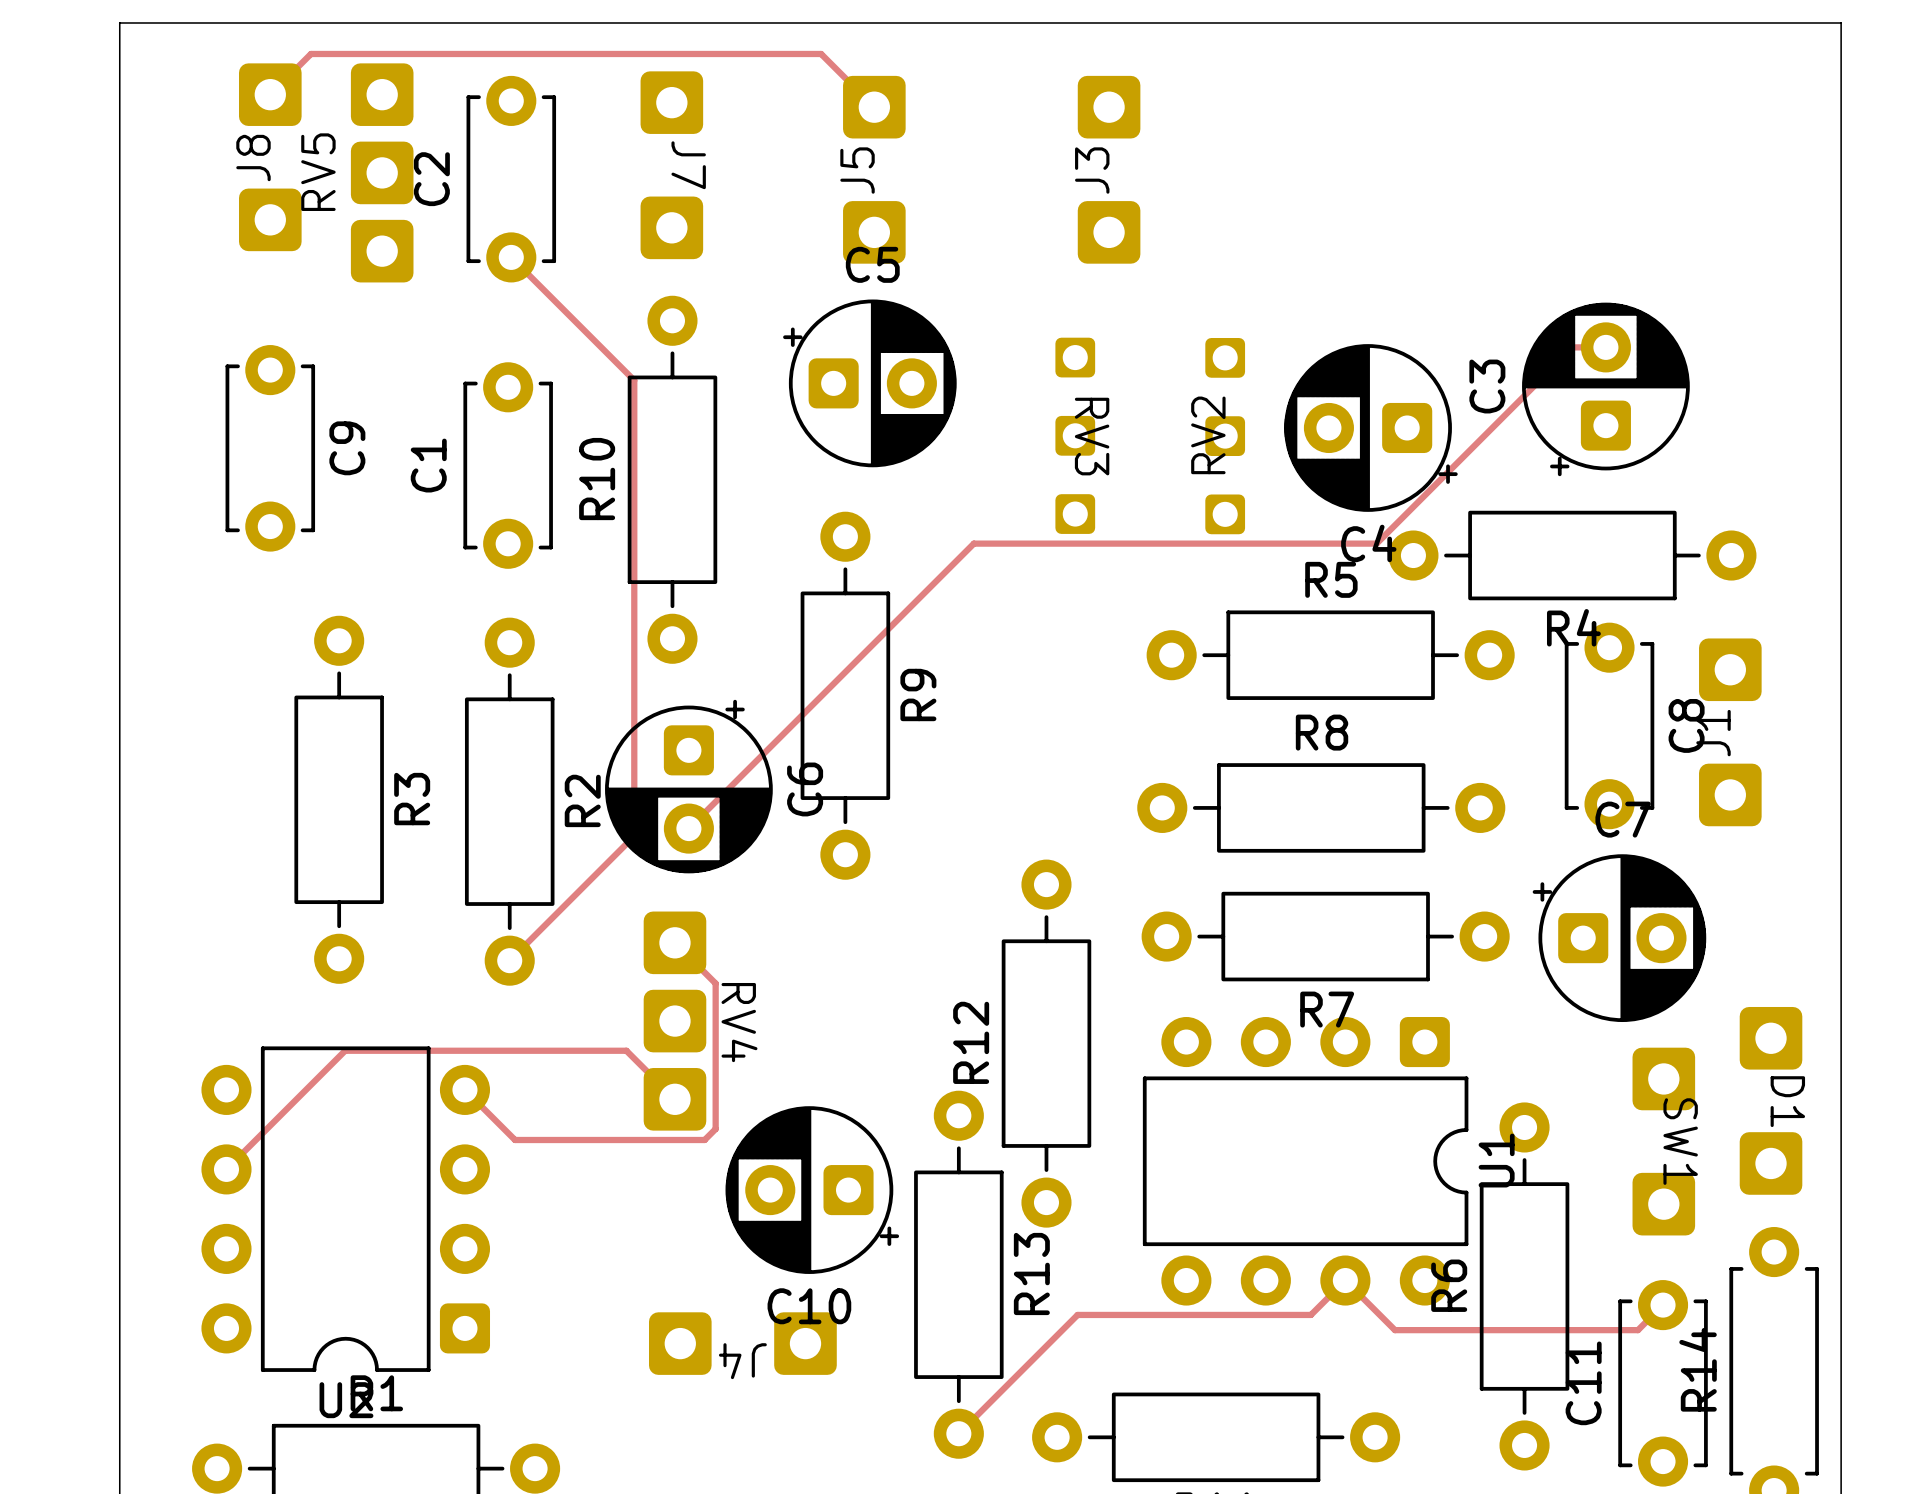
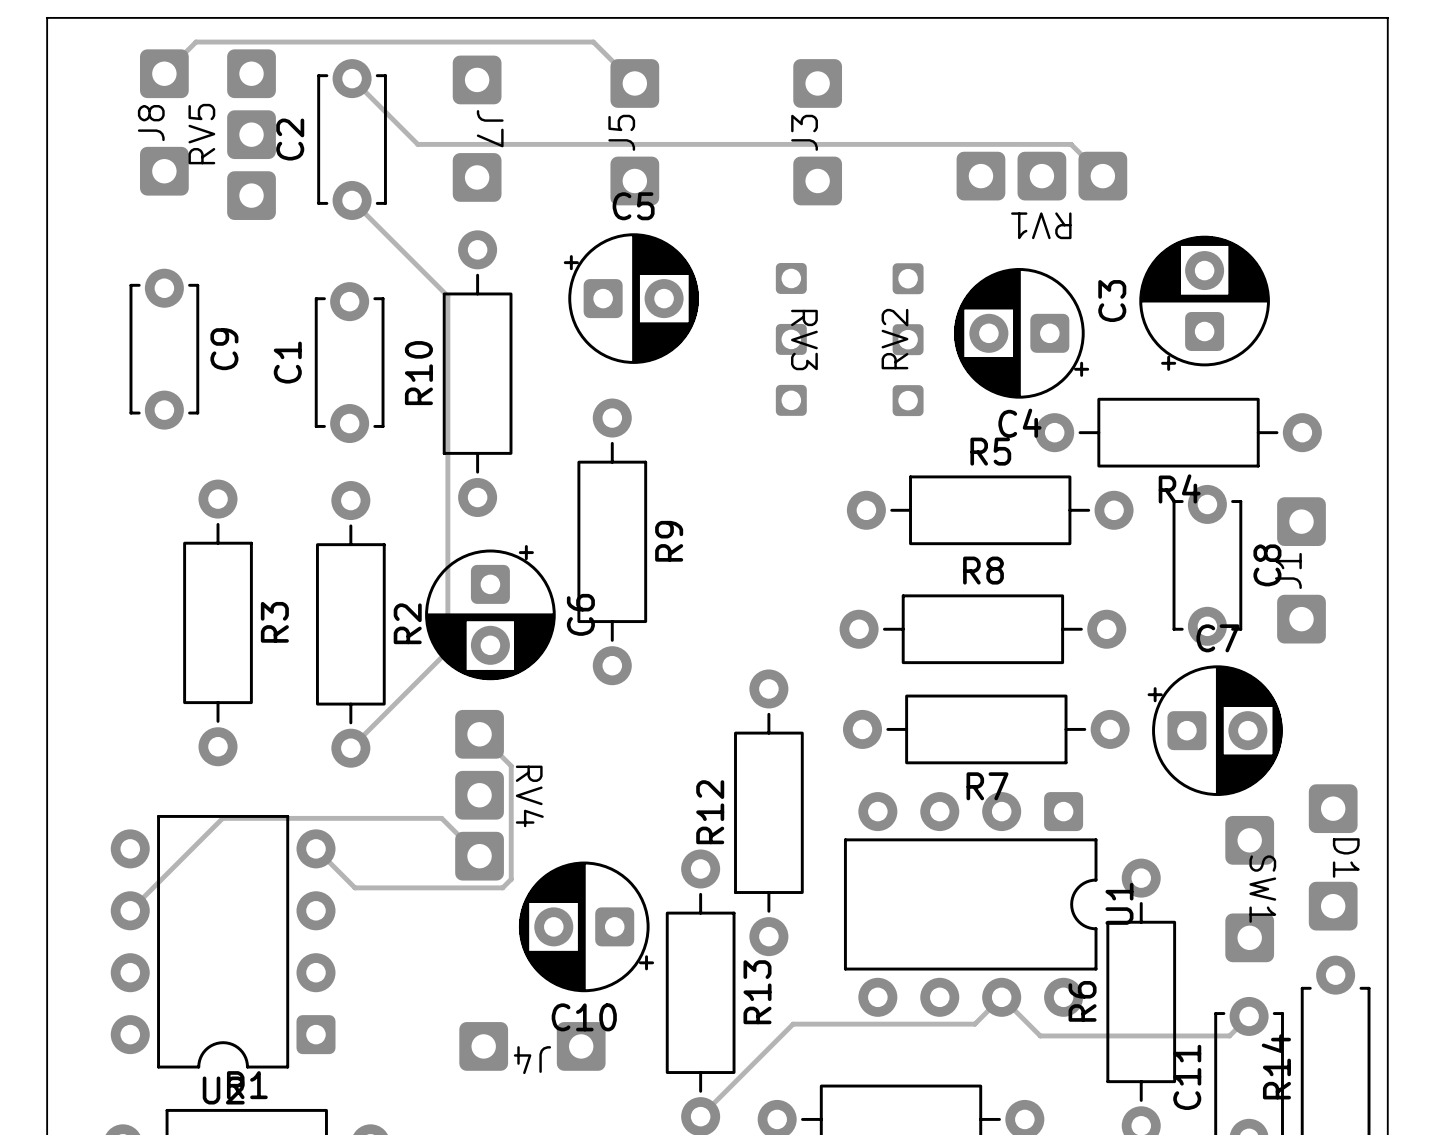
track: none -> (352, 78) (417, 144) (1071, 144) (1102, 176)
RV1: none -> (1041, 176)
track: (1605, 347) (1572, 347) (1376, 543) (973, 543) (688, 828) -> none

